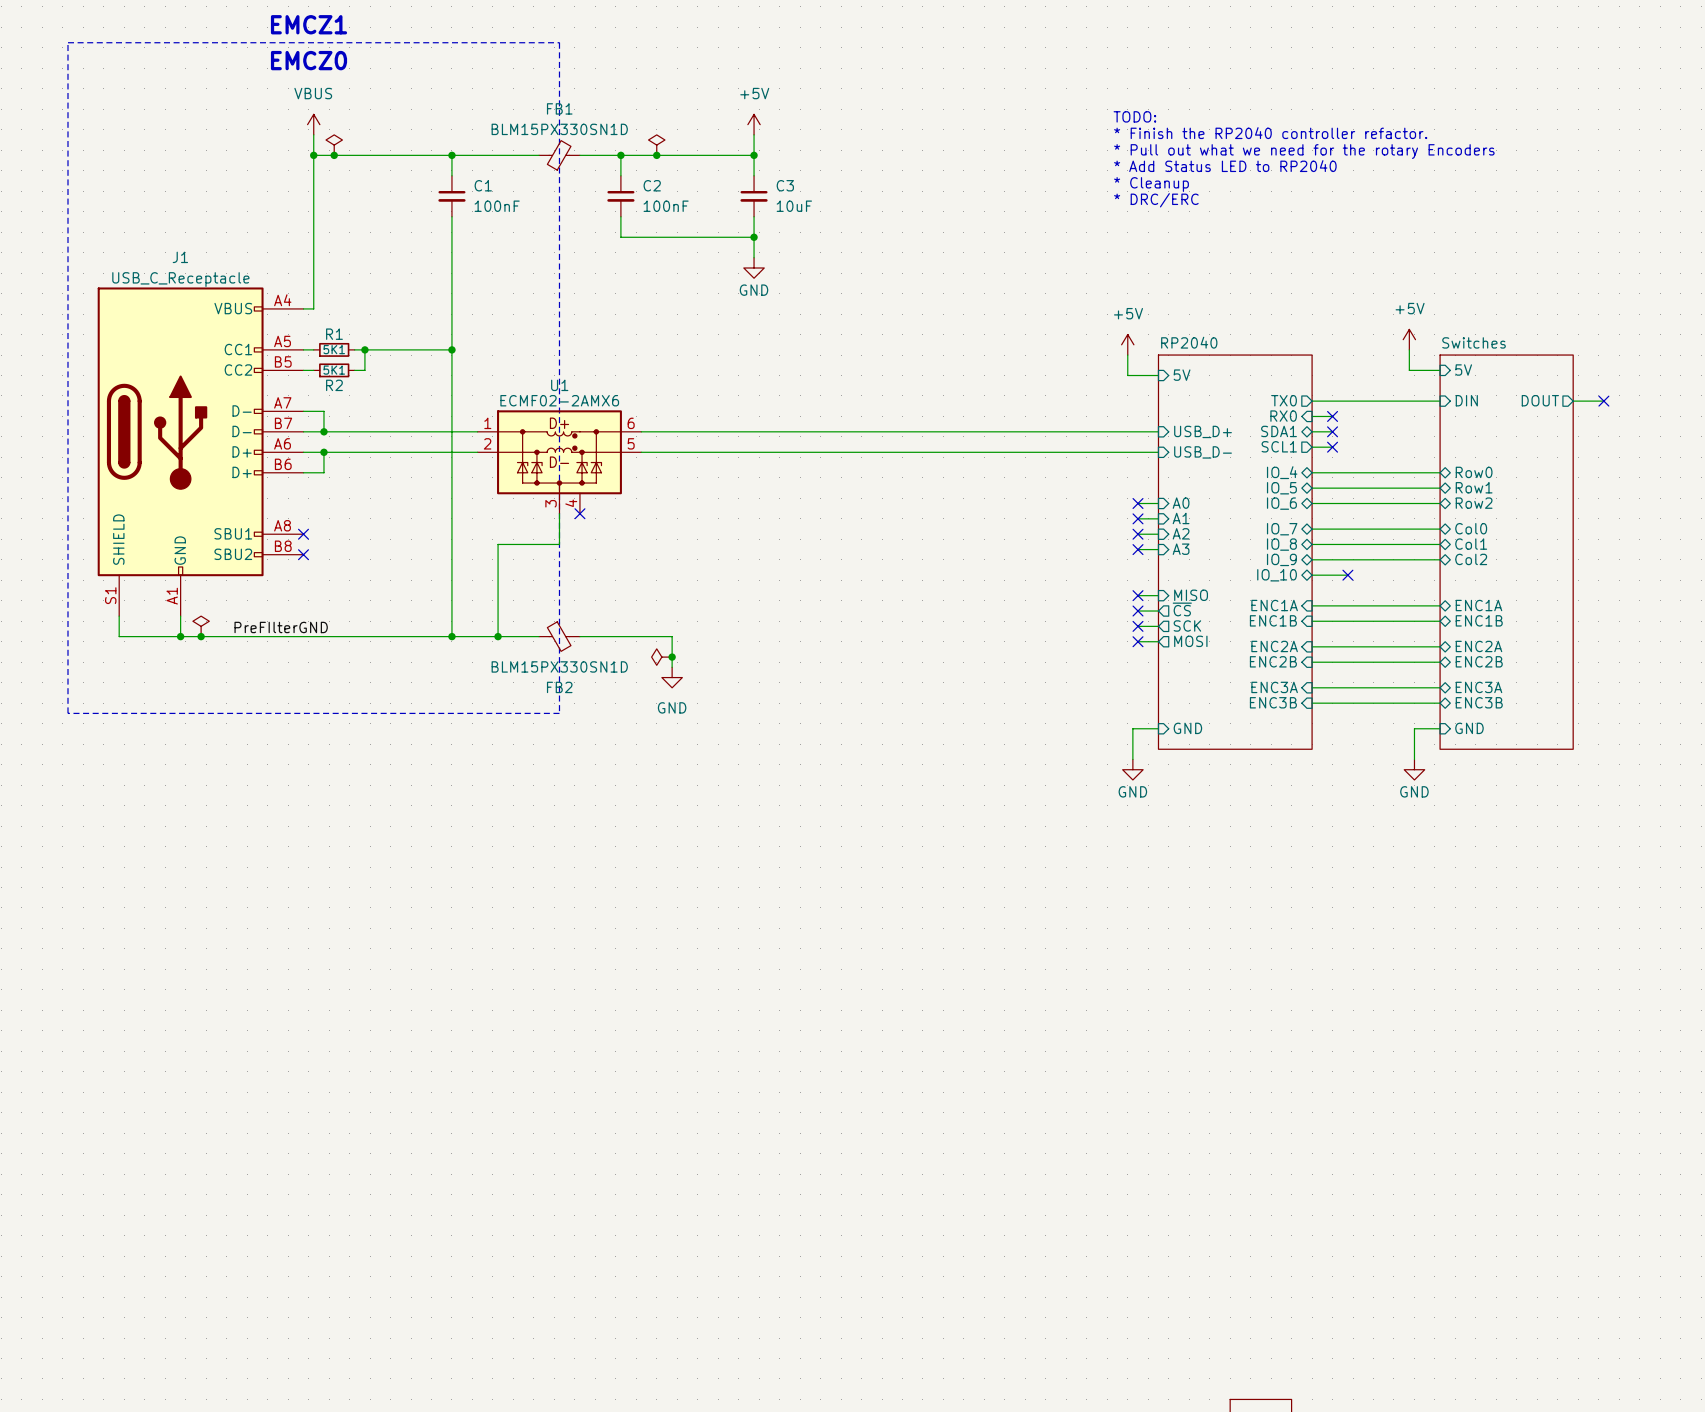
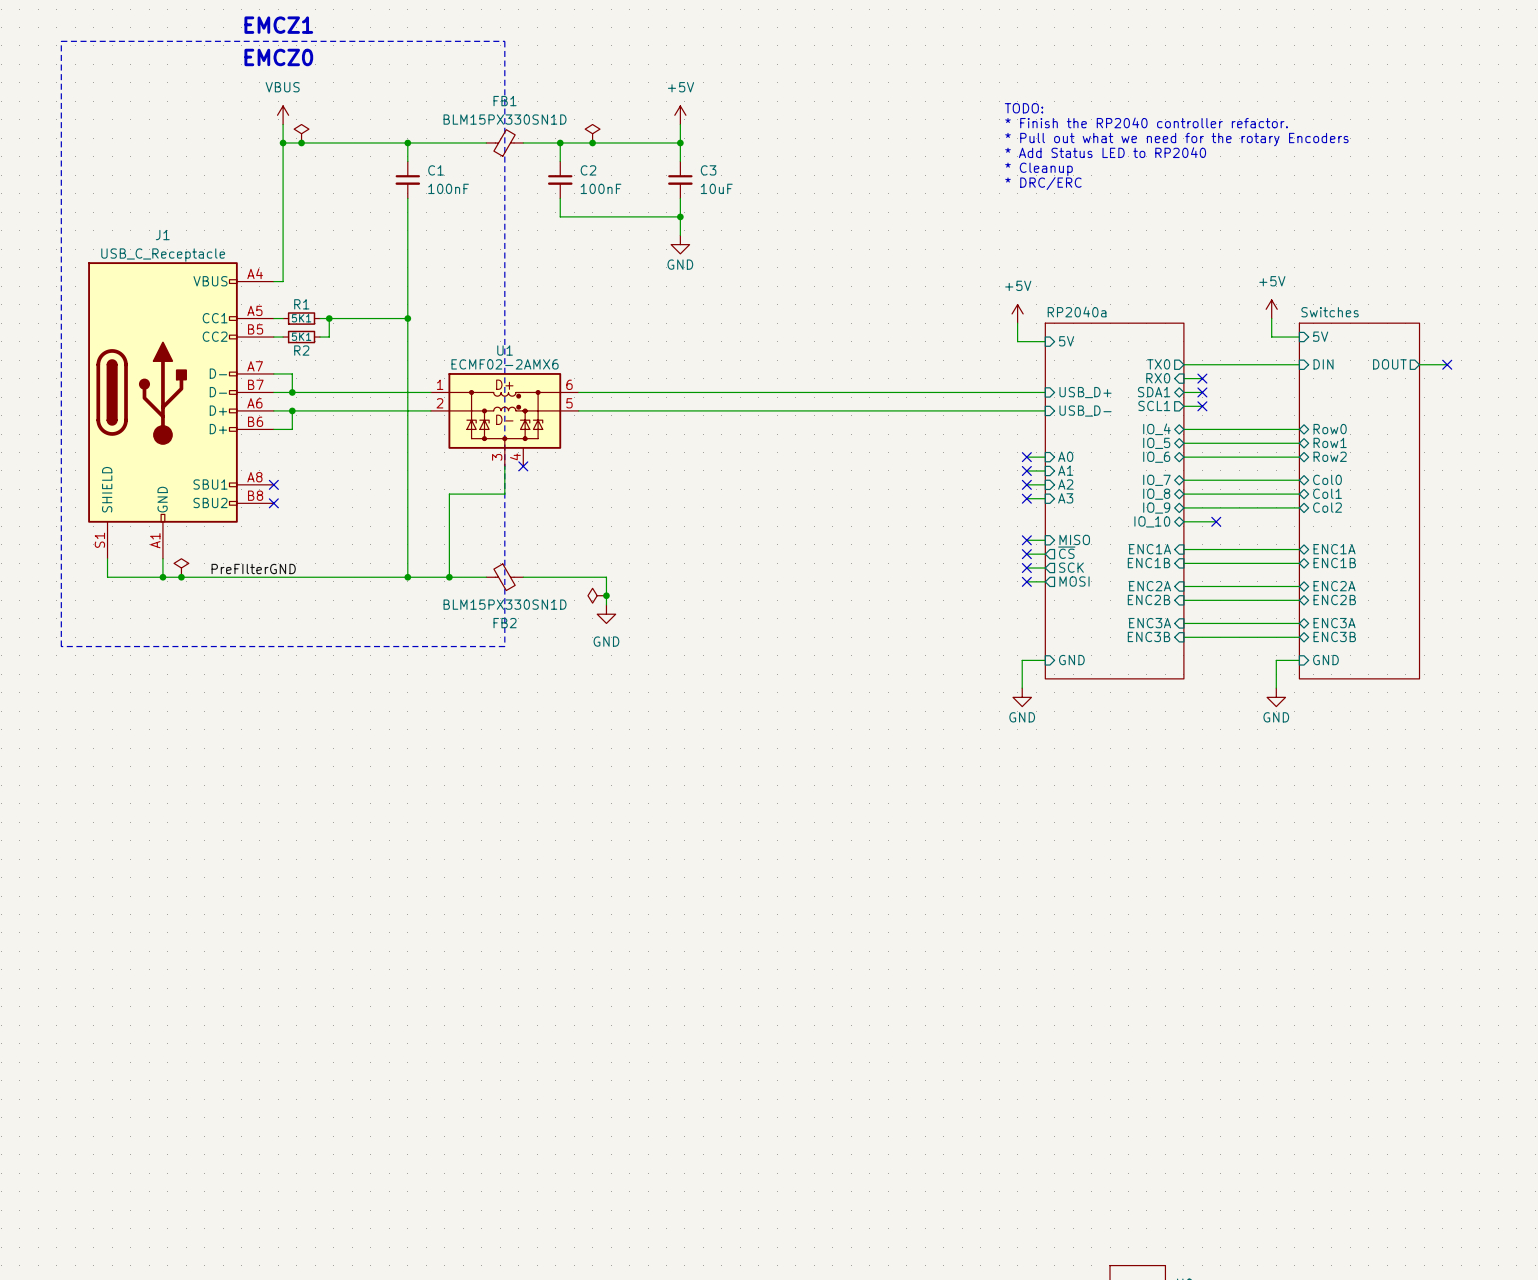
sheet RP2040 name: RP2040 (1189, 342) -> RP2040a (1077, 312)

